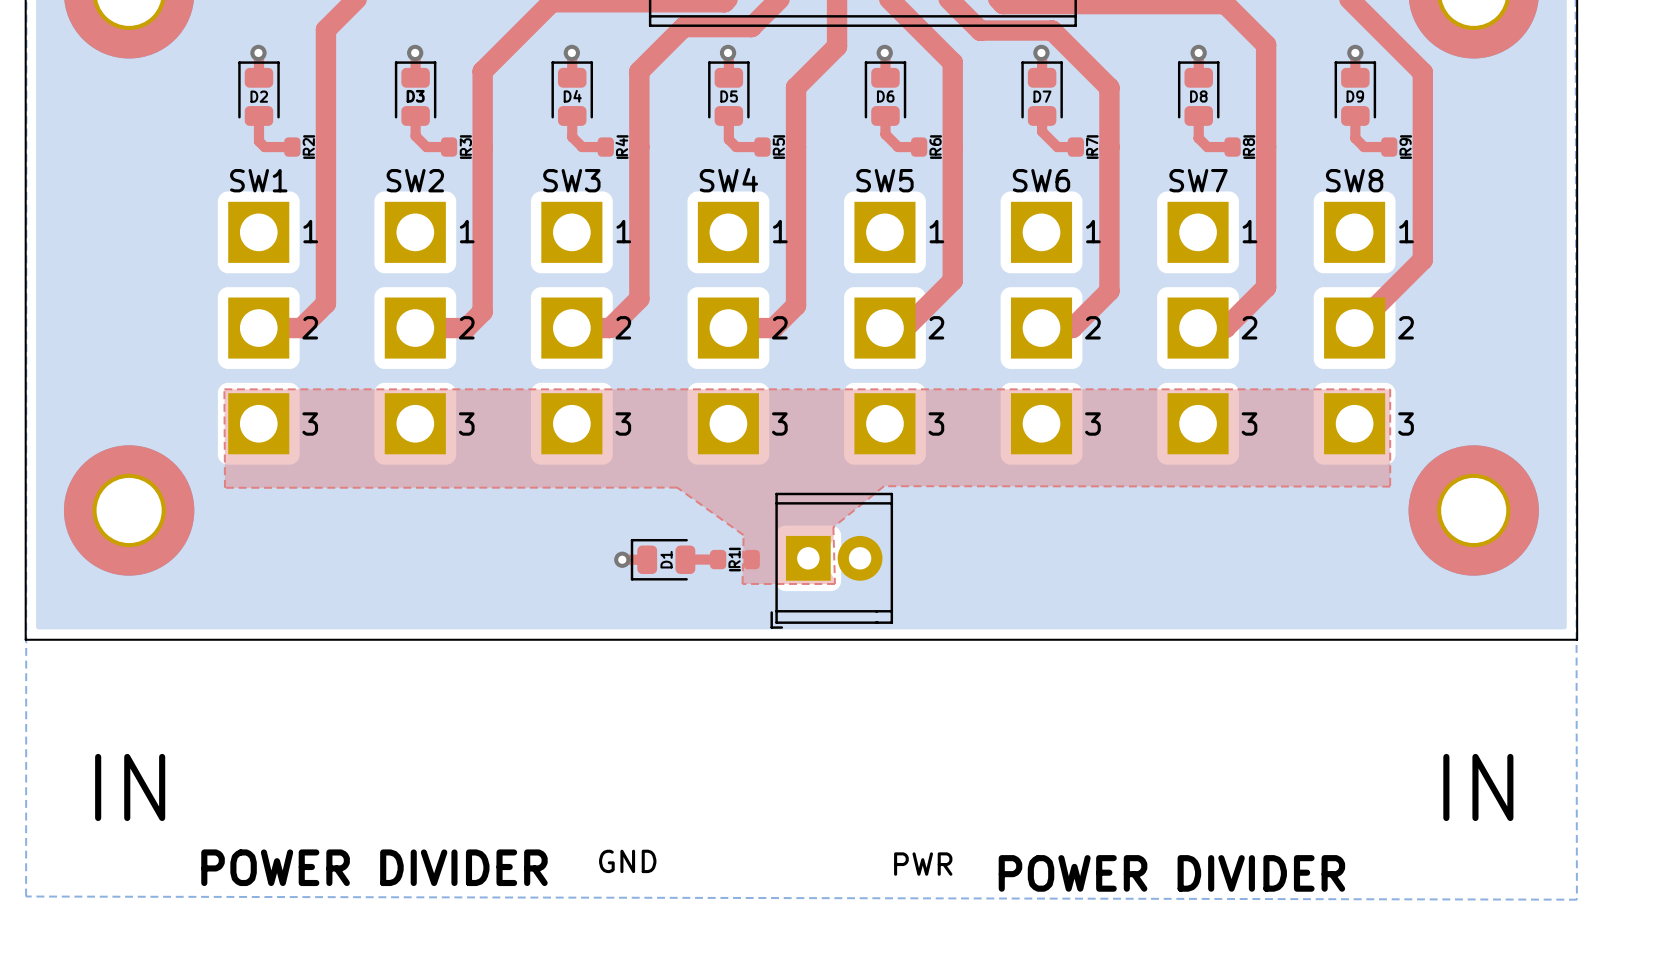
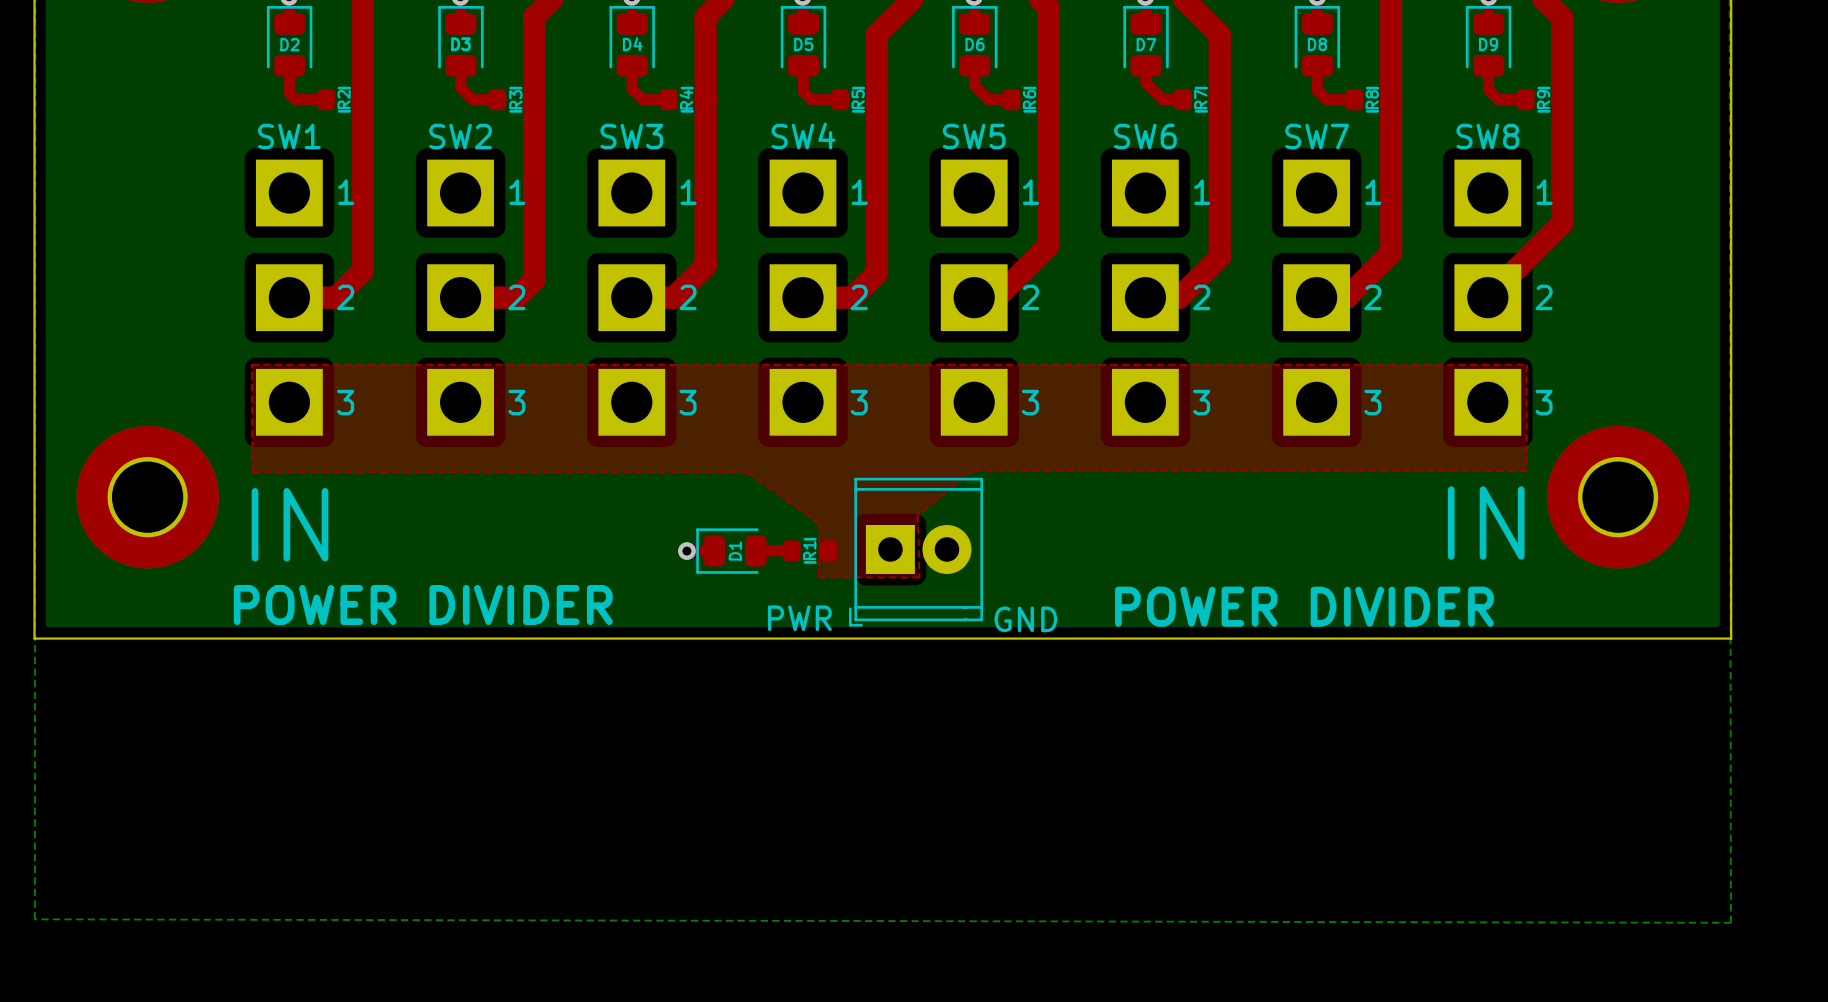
text position: IN (130, 787) -> IN (290, 524)
text position: IN (1478, 787) -> IN (1486, 523)
text position: GND (627, 861) -> GND (1025, 619)
text position: PWR (923, 864) -> PWR (799, 618)
text position: POWER DIVIDER (374, 867) -> POWER DIVIDER (423, 605)
text position: POWER DIVIDER (1171, 873) -> POWER DIVIDER (1304, 606)

